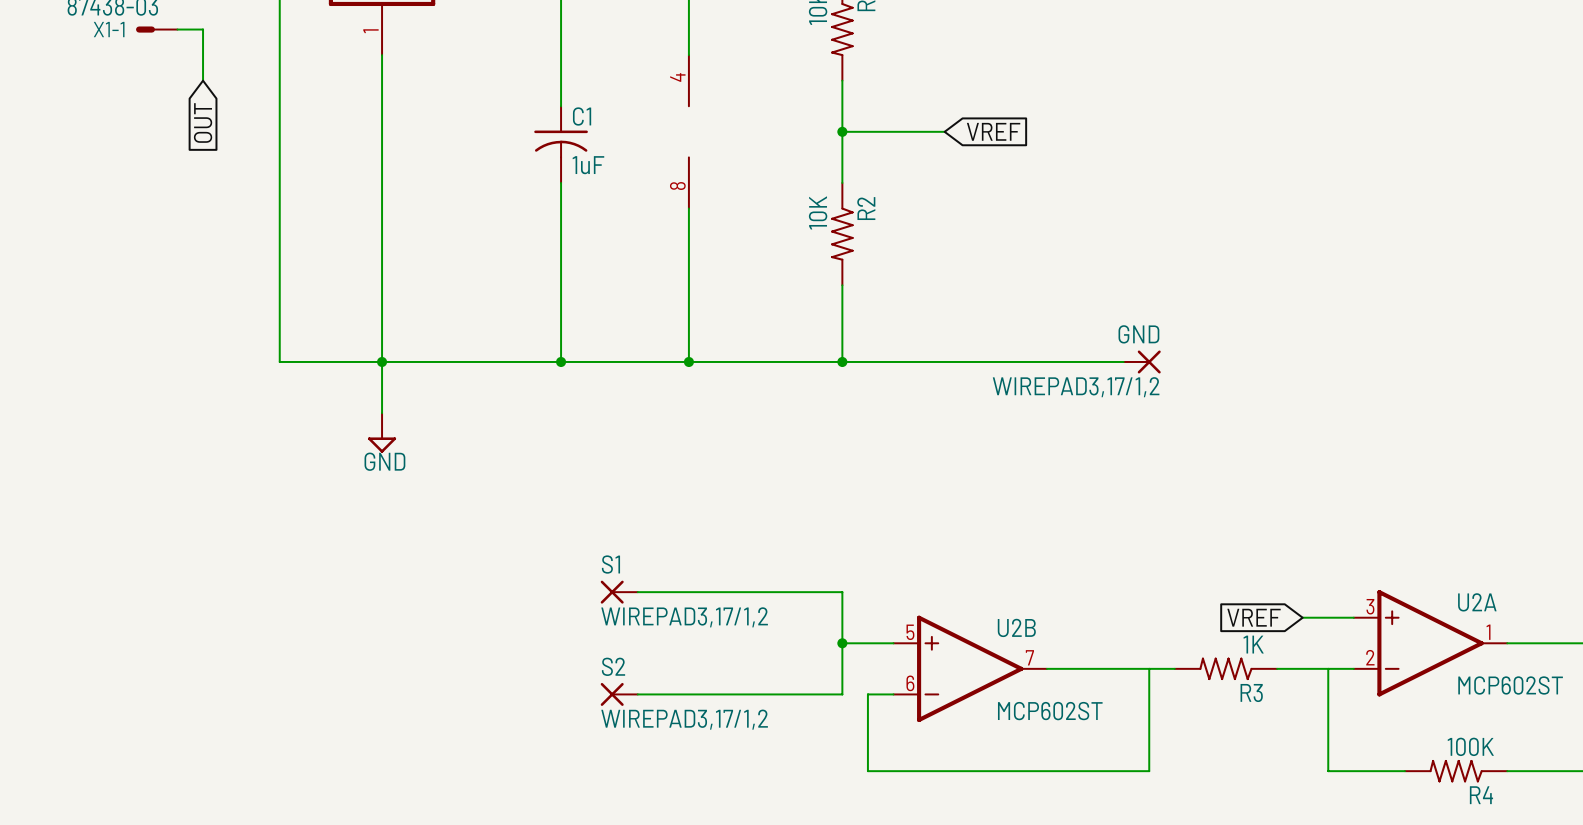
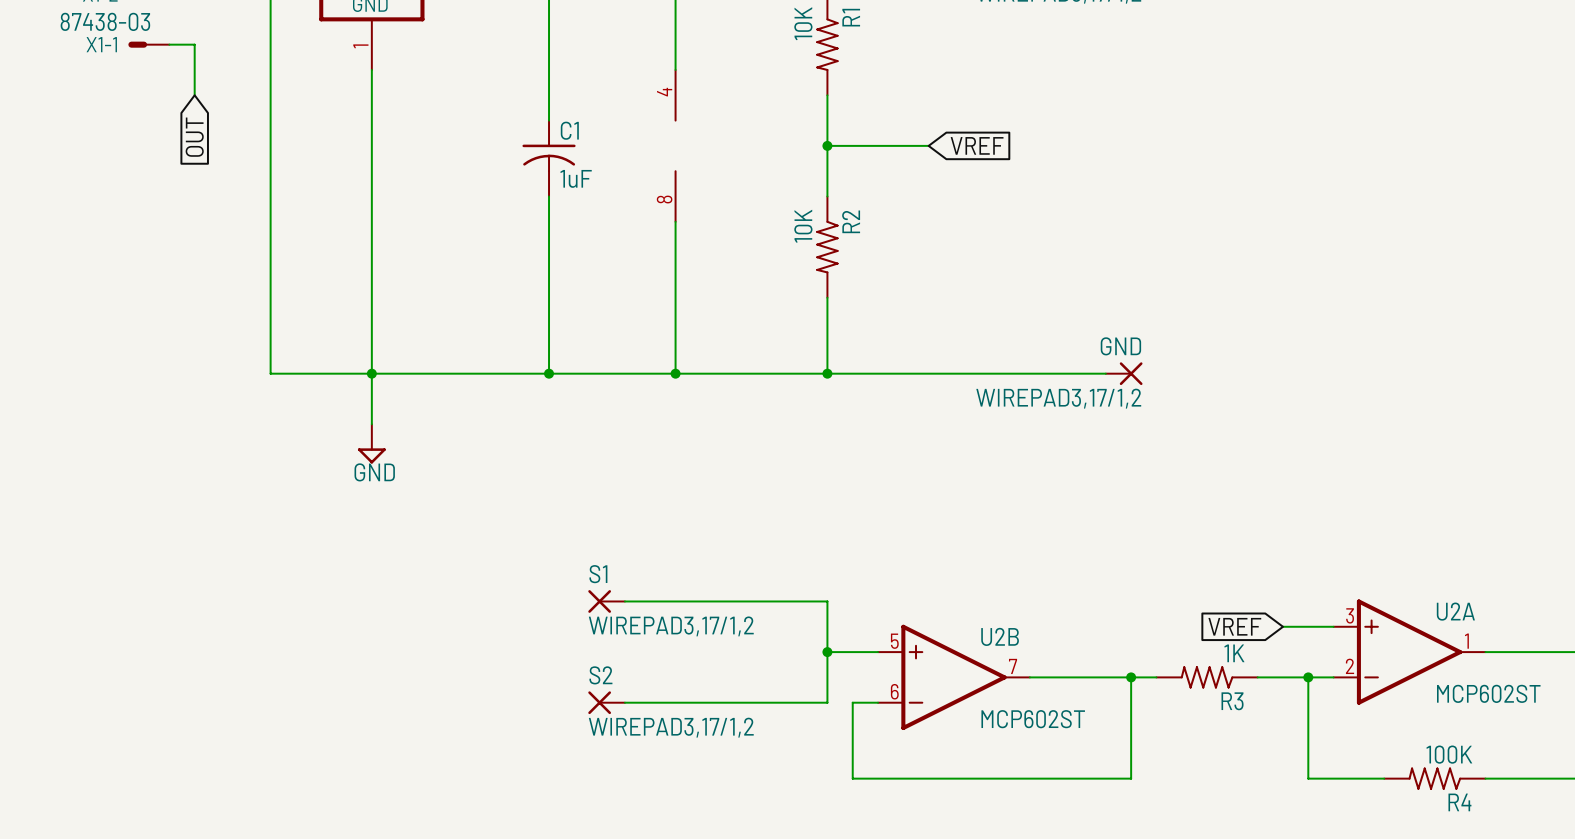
junction: none -> (1131, 677)
junction: none -> (1308, 677)

